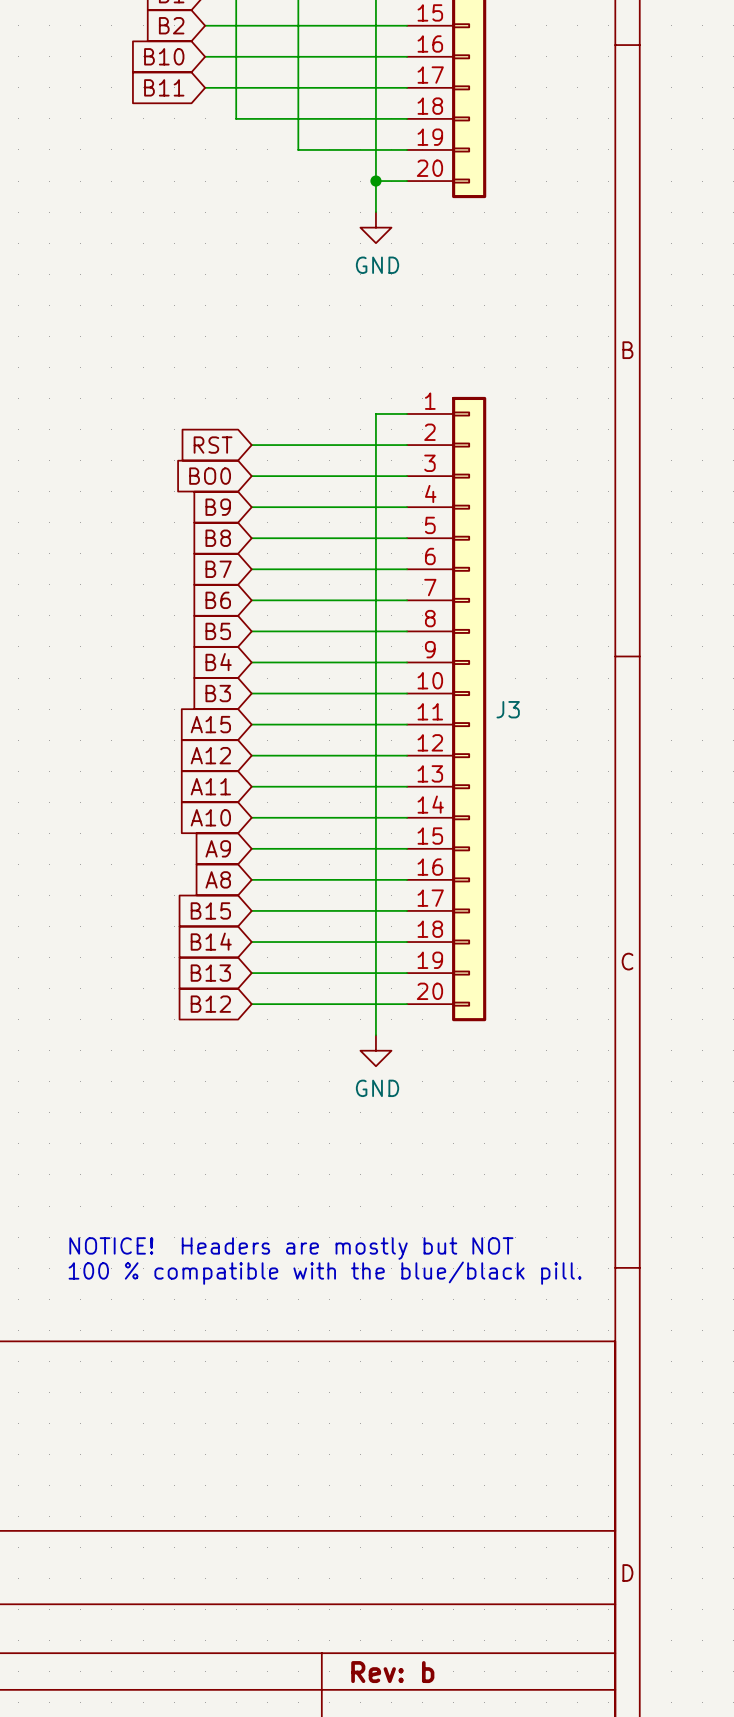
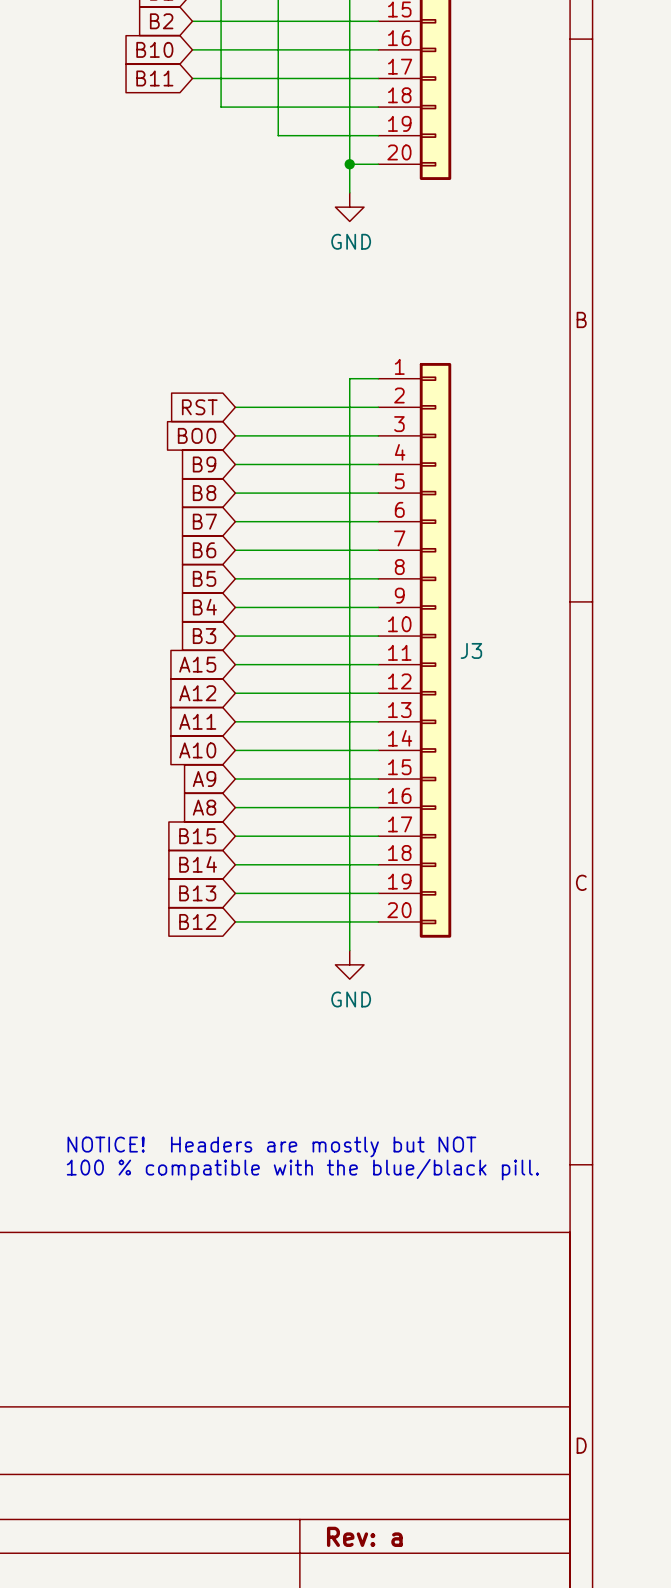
title block: Rev: b (392, 1672) -> Rev: a (364, 1536)

